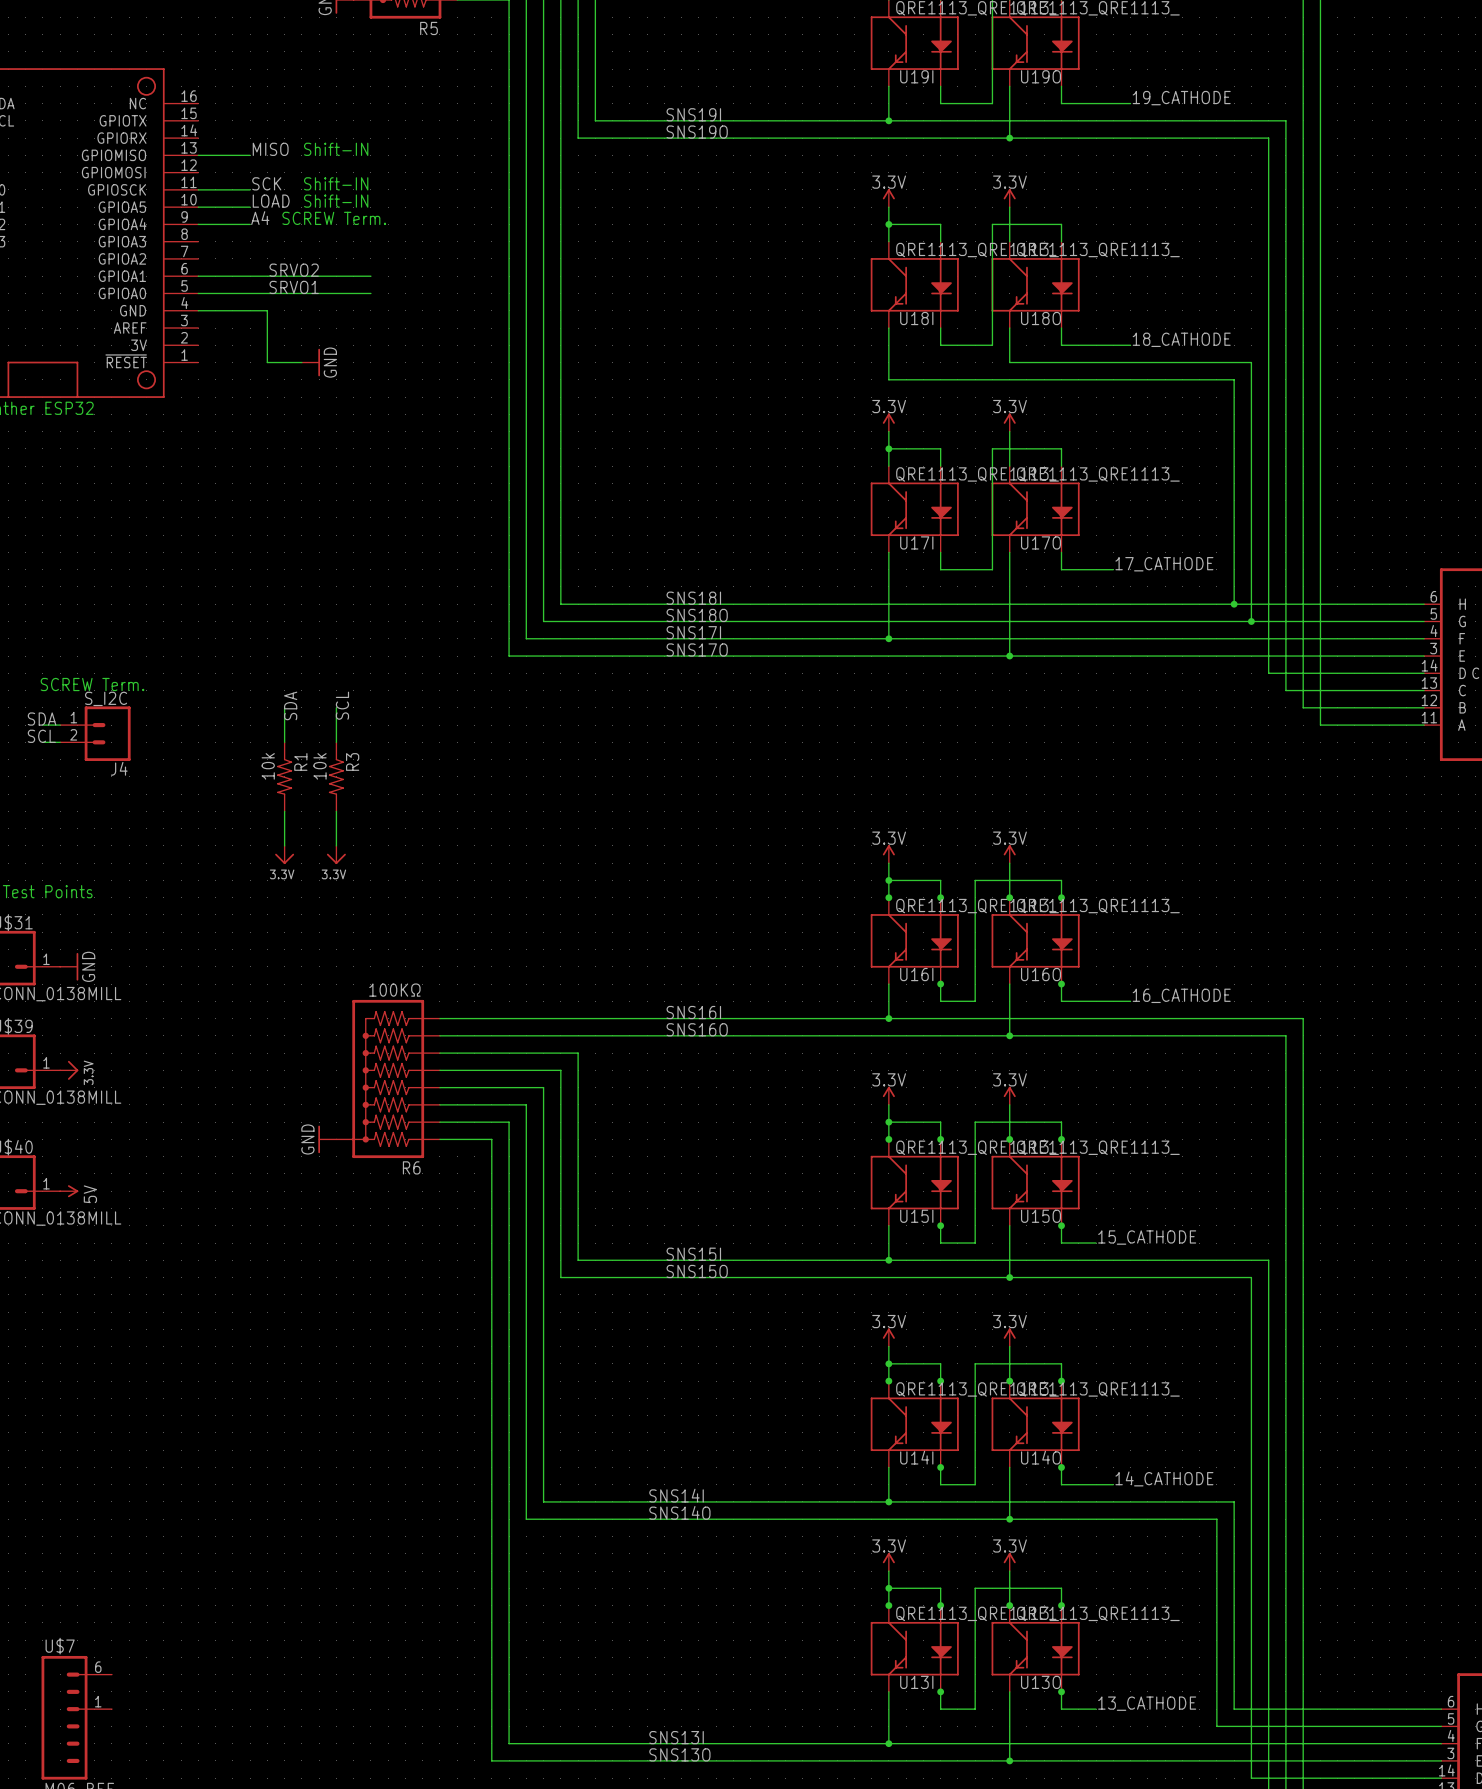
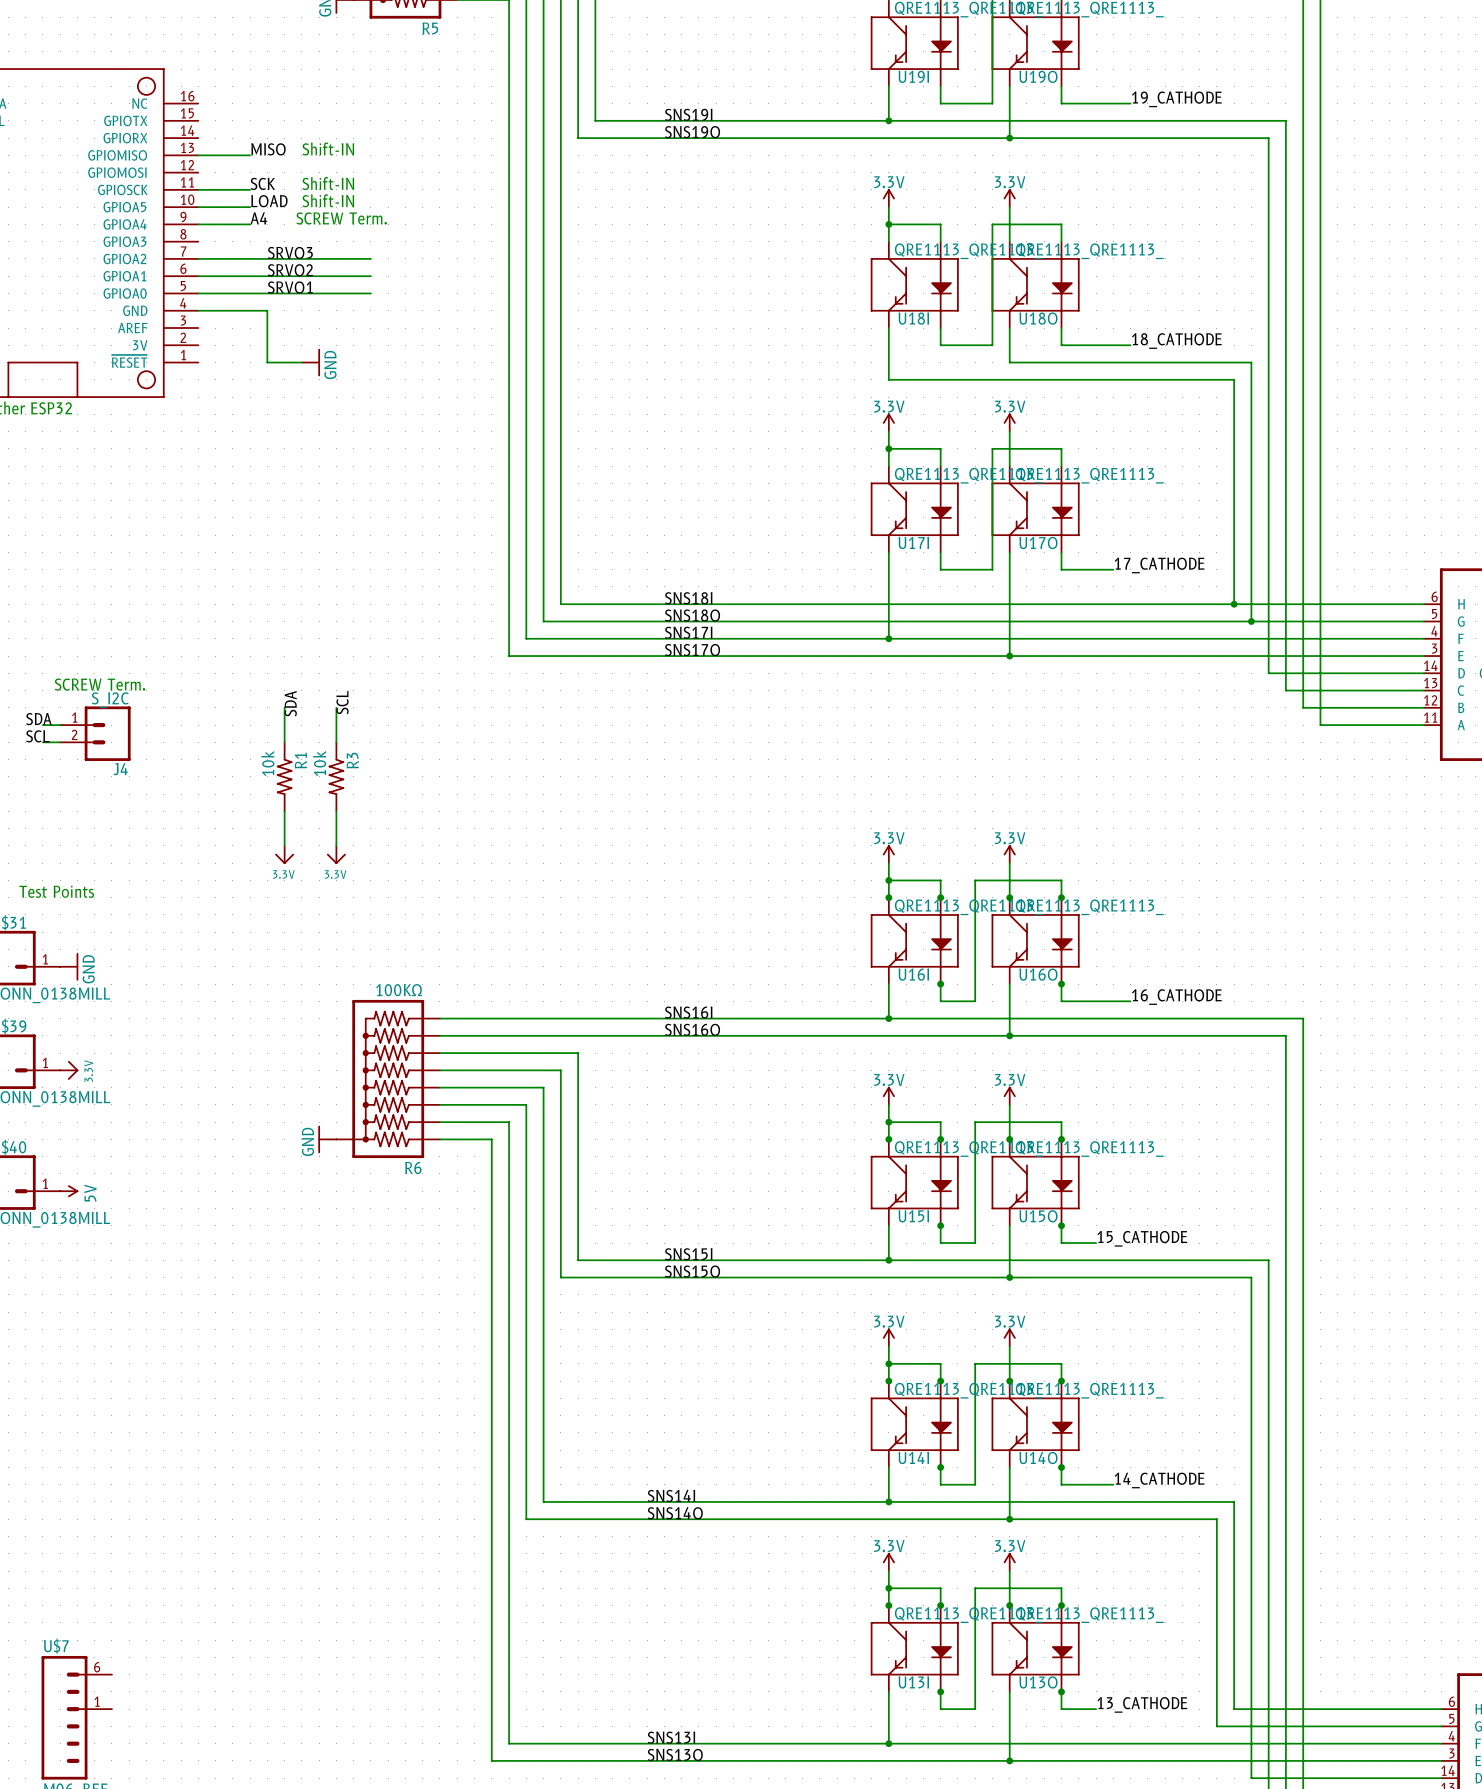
label: none -> SRVO3 (290, 252)
wire: none -> (198, 258) (370, 258)

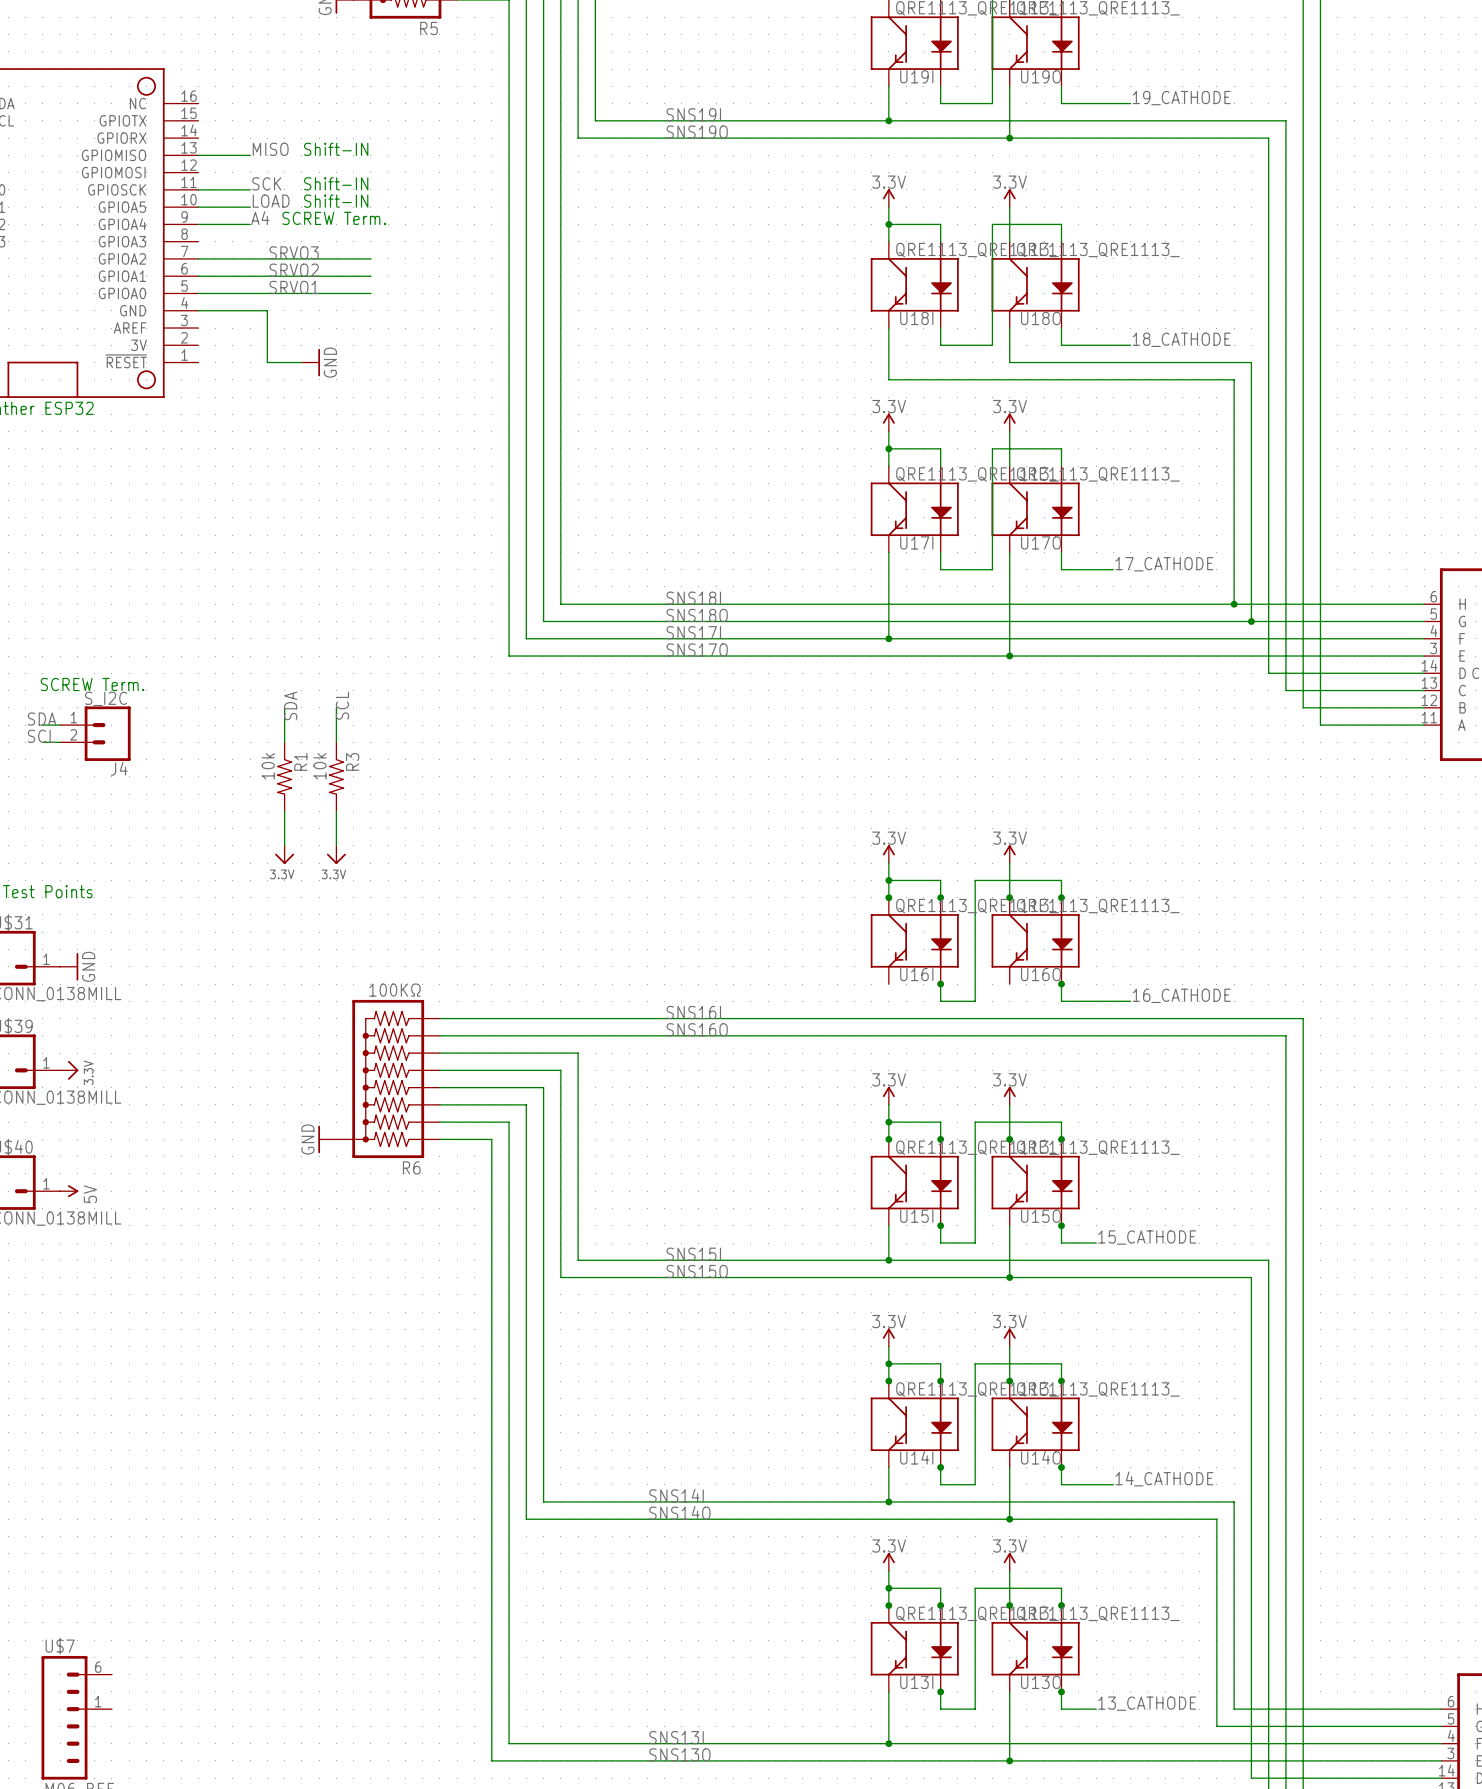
wire: (888, 984) (888, 1018) -> none
wire: (1009, 984) (1009, 1035) -> none
junction: (888, 1018) -> none
junction: (1009, 1035) -> none

